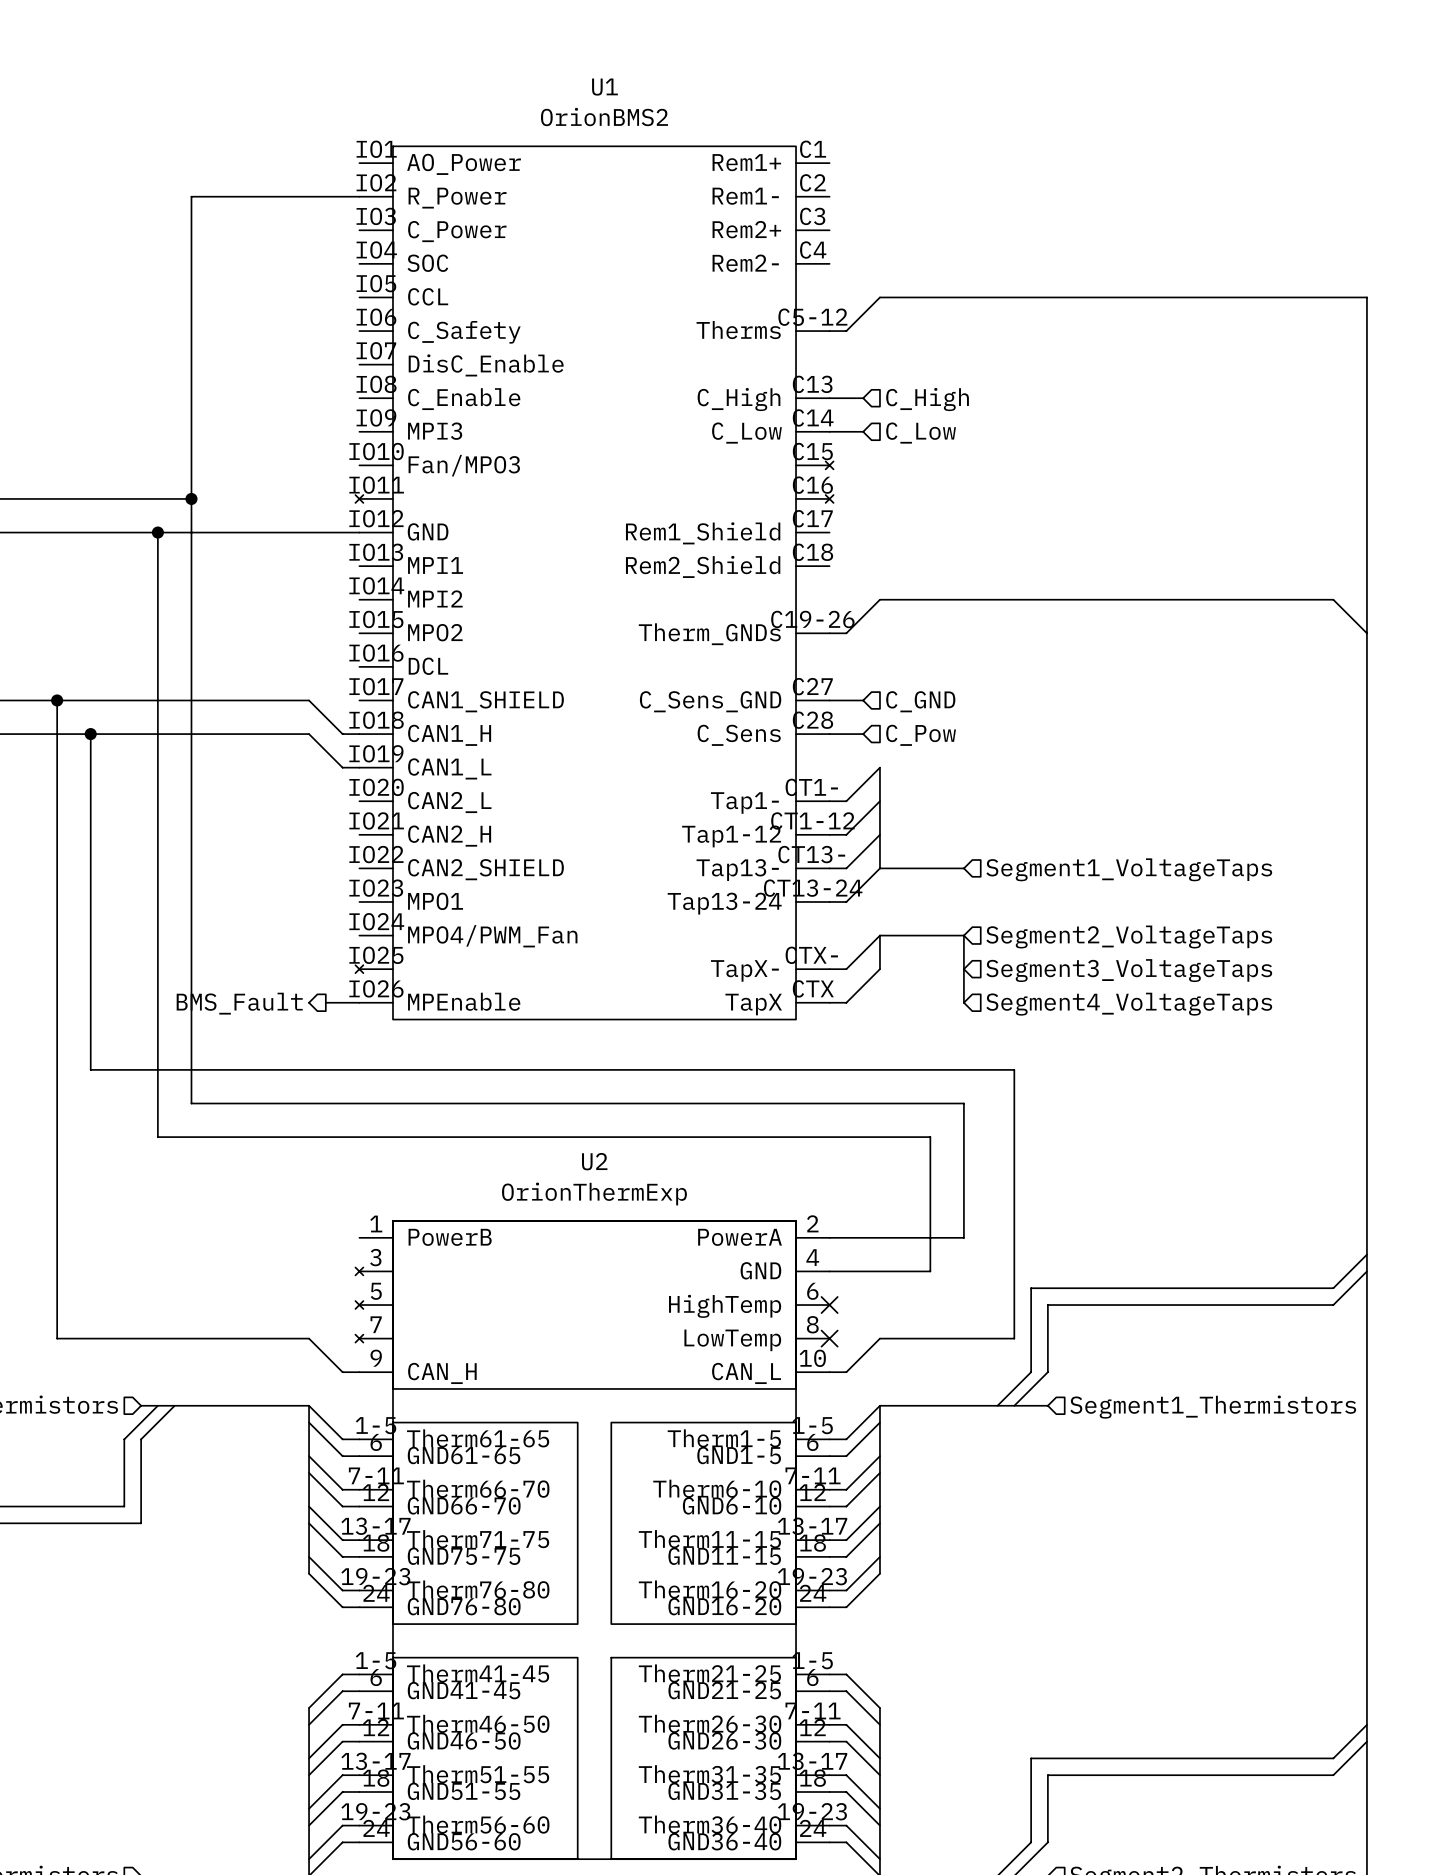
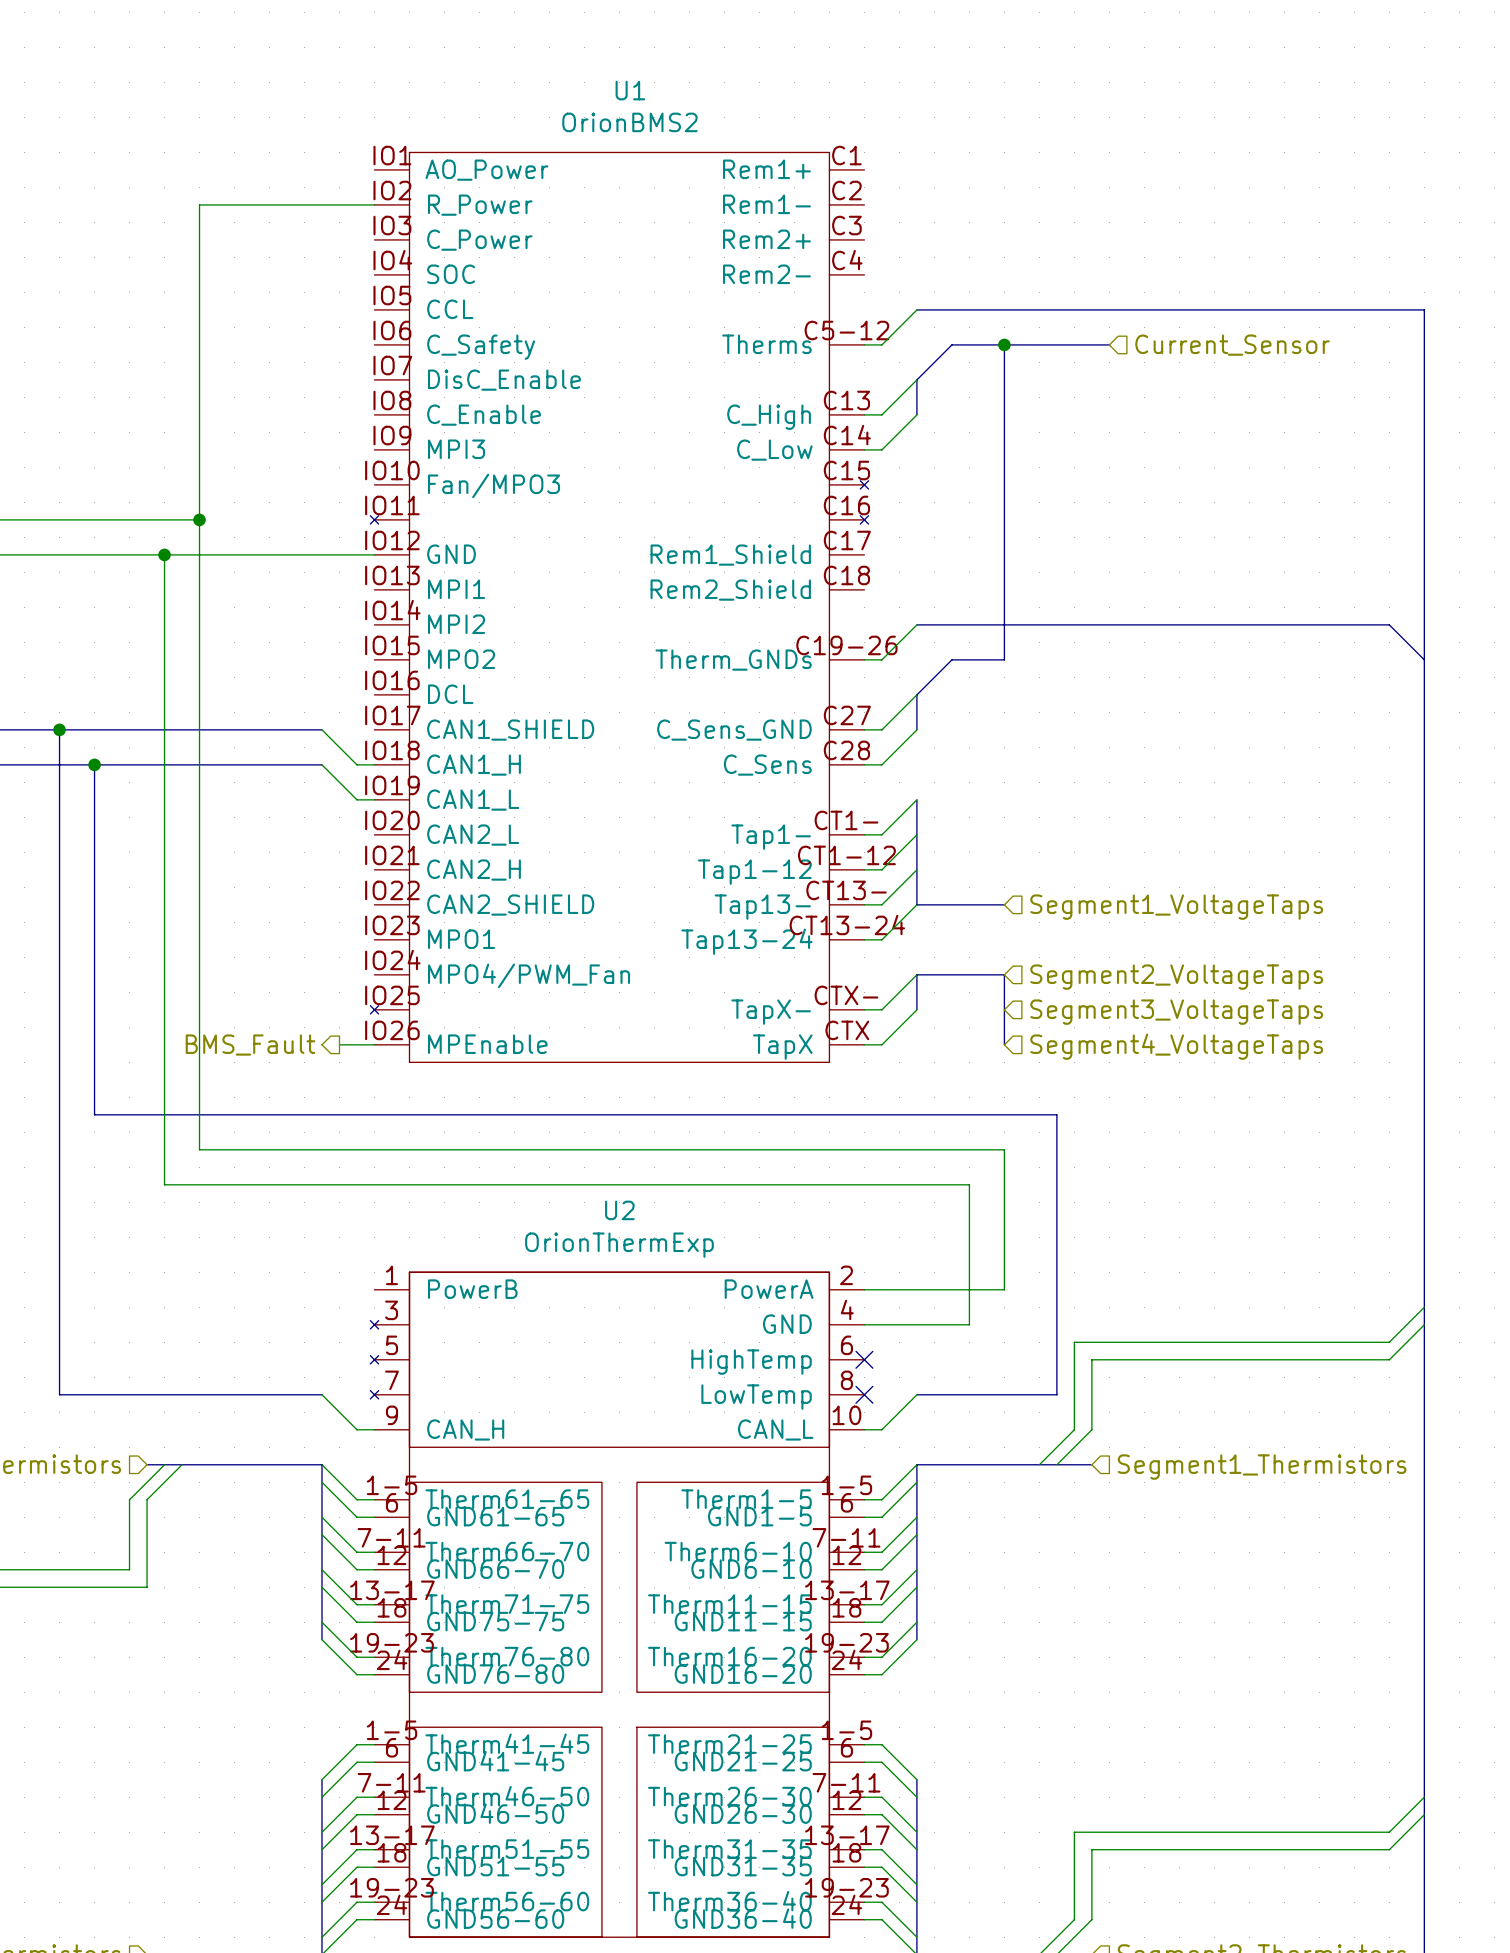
bus: none -> (1004, 344) (1004, 659) (951, 659) (916, 694) (916, 729)
junction: none -> (1004, 344)
bus: none -> (1109, 344) (951, 344) (916, 379) (916, 414)
hierarchical label: none -> Current_Sensor (1232, 345)
wire: (846, 398) (863, 398) -> (881, 414) (916, 379)
hierarchical label: C_High (927, 399) -> none
wire: (846, 431) (863, 431) -> (881, 449) (916, 414)
hierarchical label: C_Low (921, 433) -> none
wire: (846, 700) (863, 700) -> (881, 729) (916, 694)
hierarchical label: C_GND (920, 701) -> none
wire: (846, 734) (863, 734) -> (881, 764) (916, 729)
hierarchical label: C_Pow (921, 735) -> none

